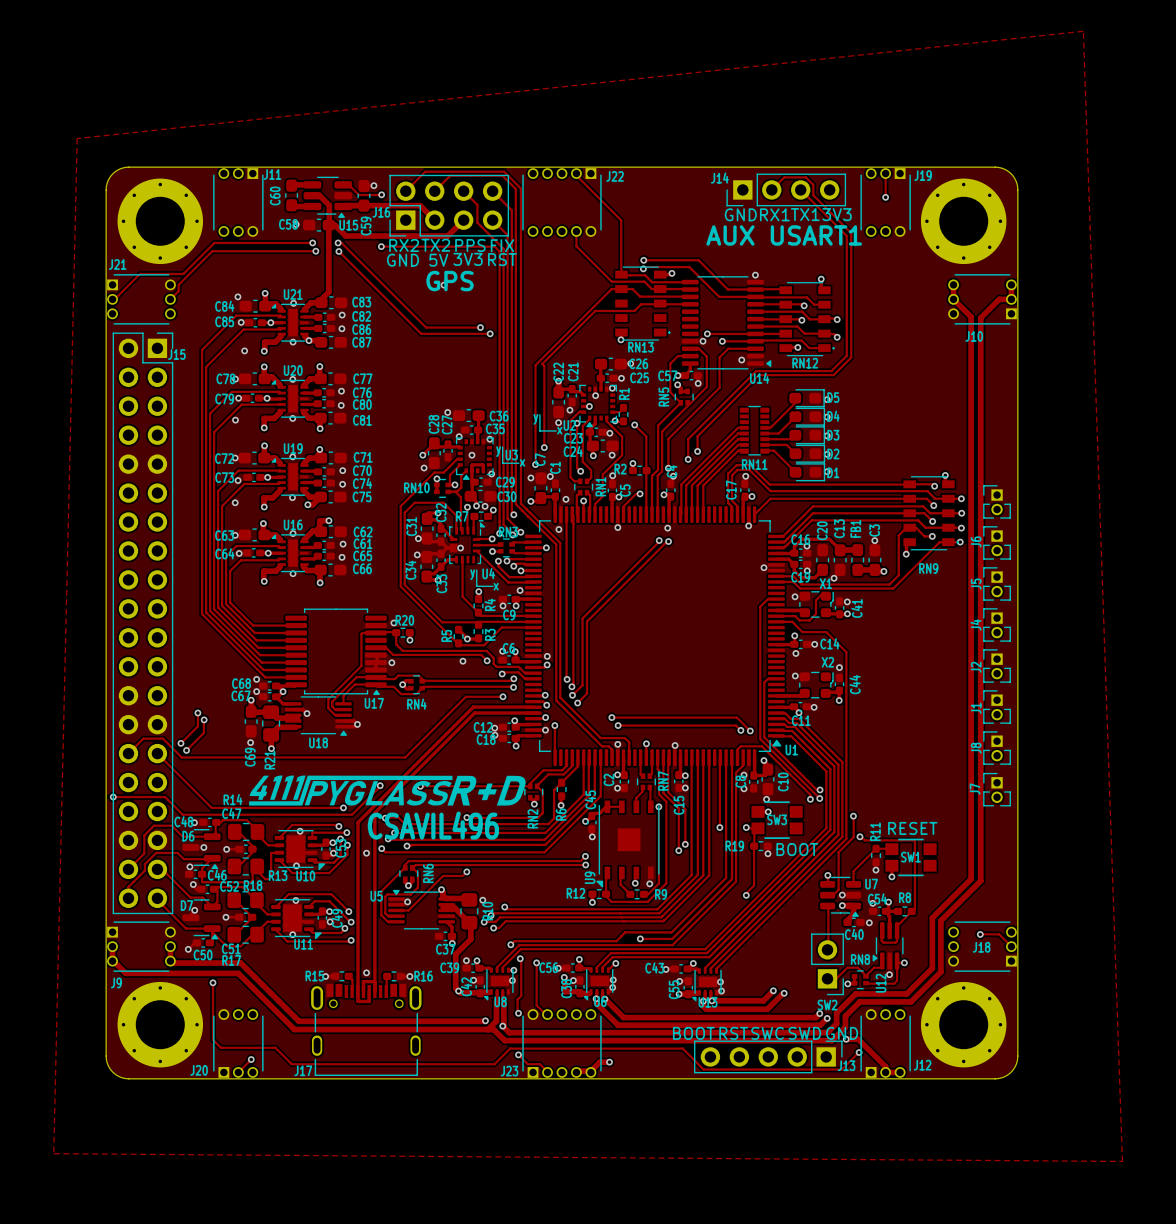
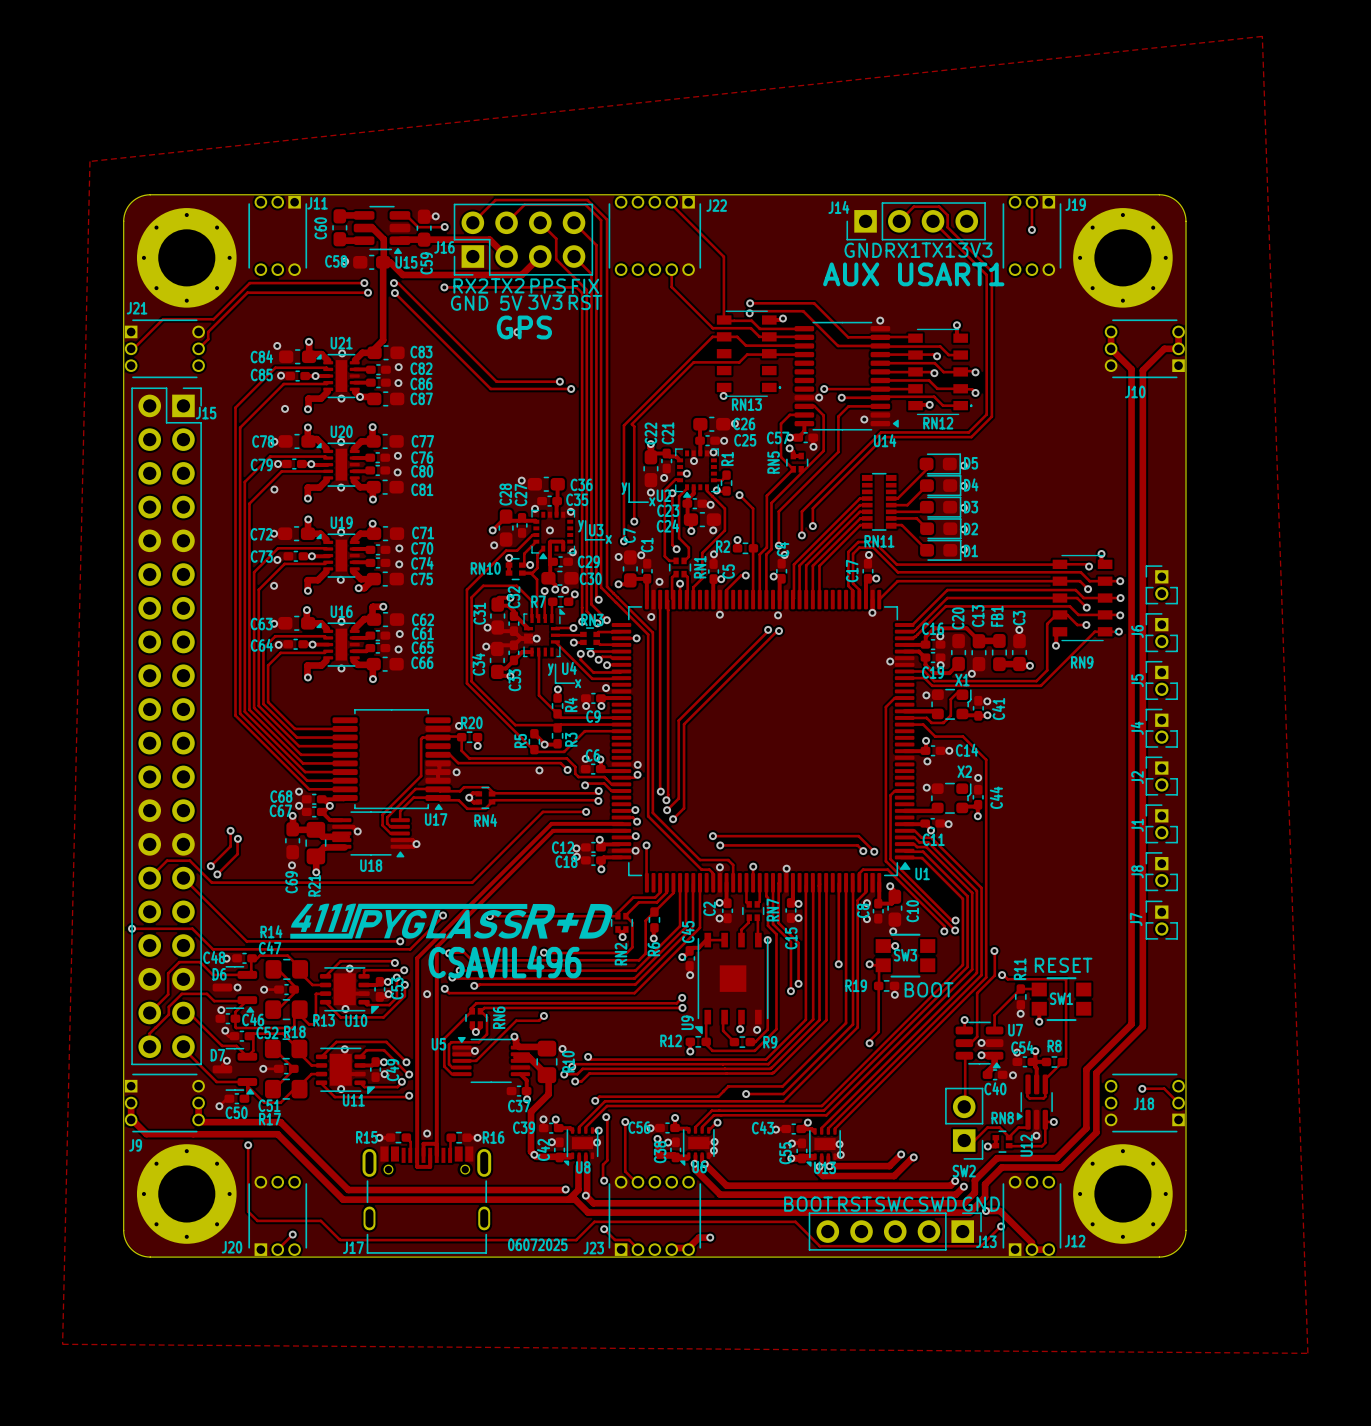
text: none -> 06072025 (537, 1244)

